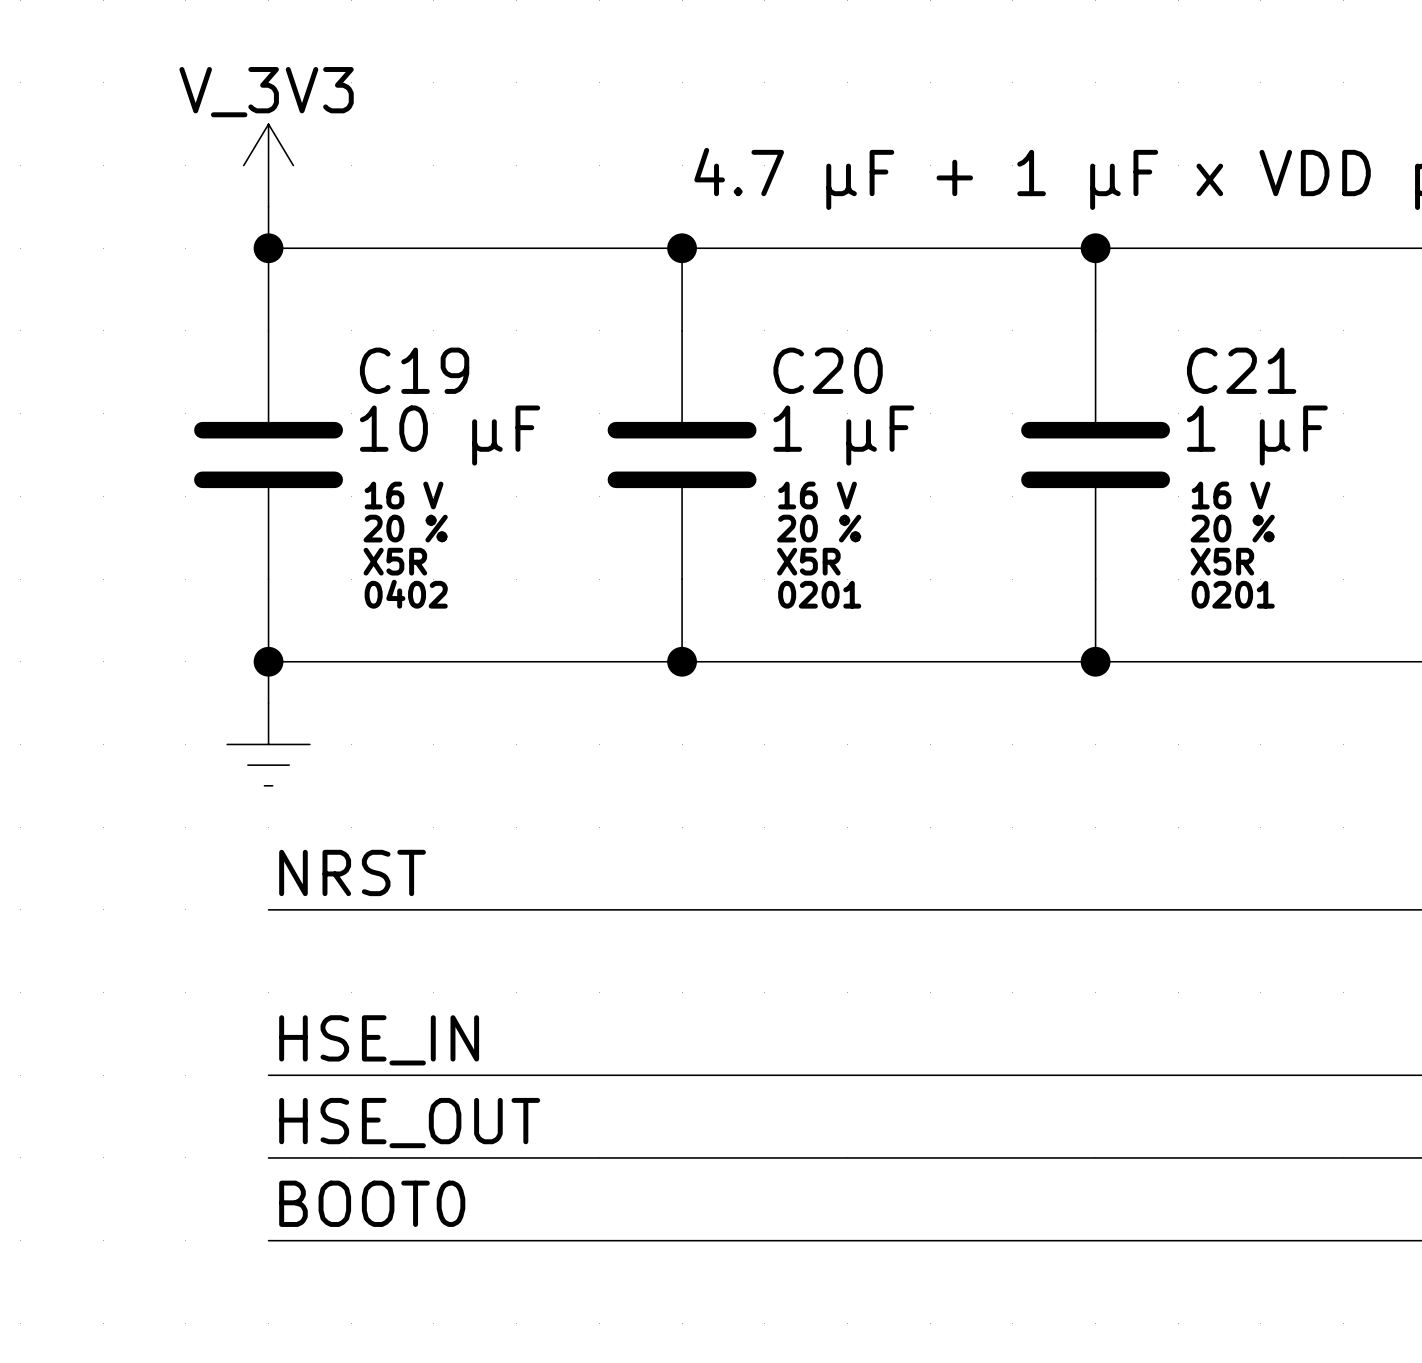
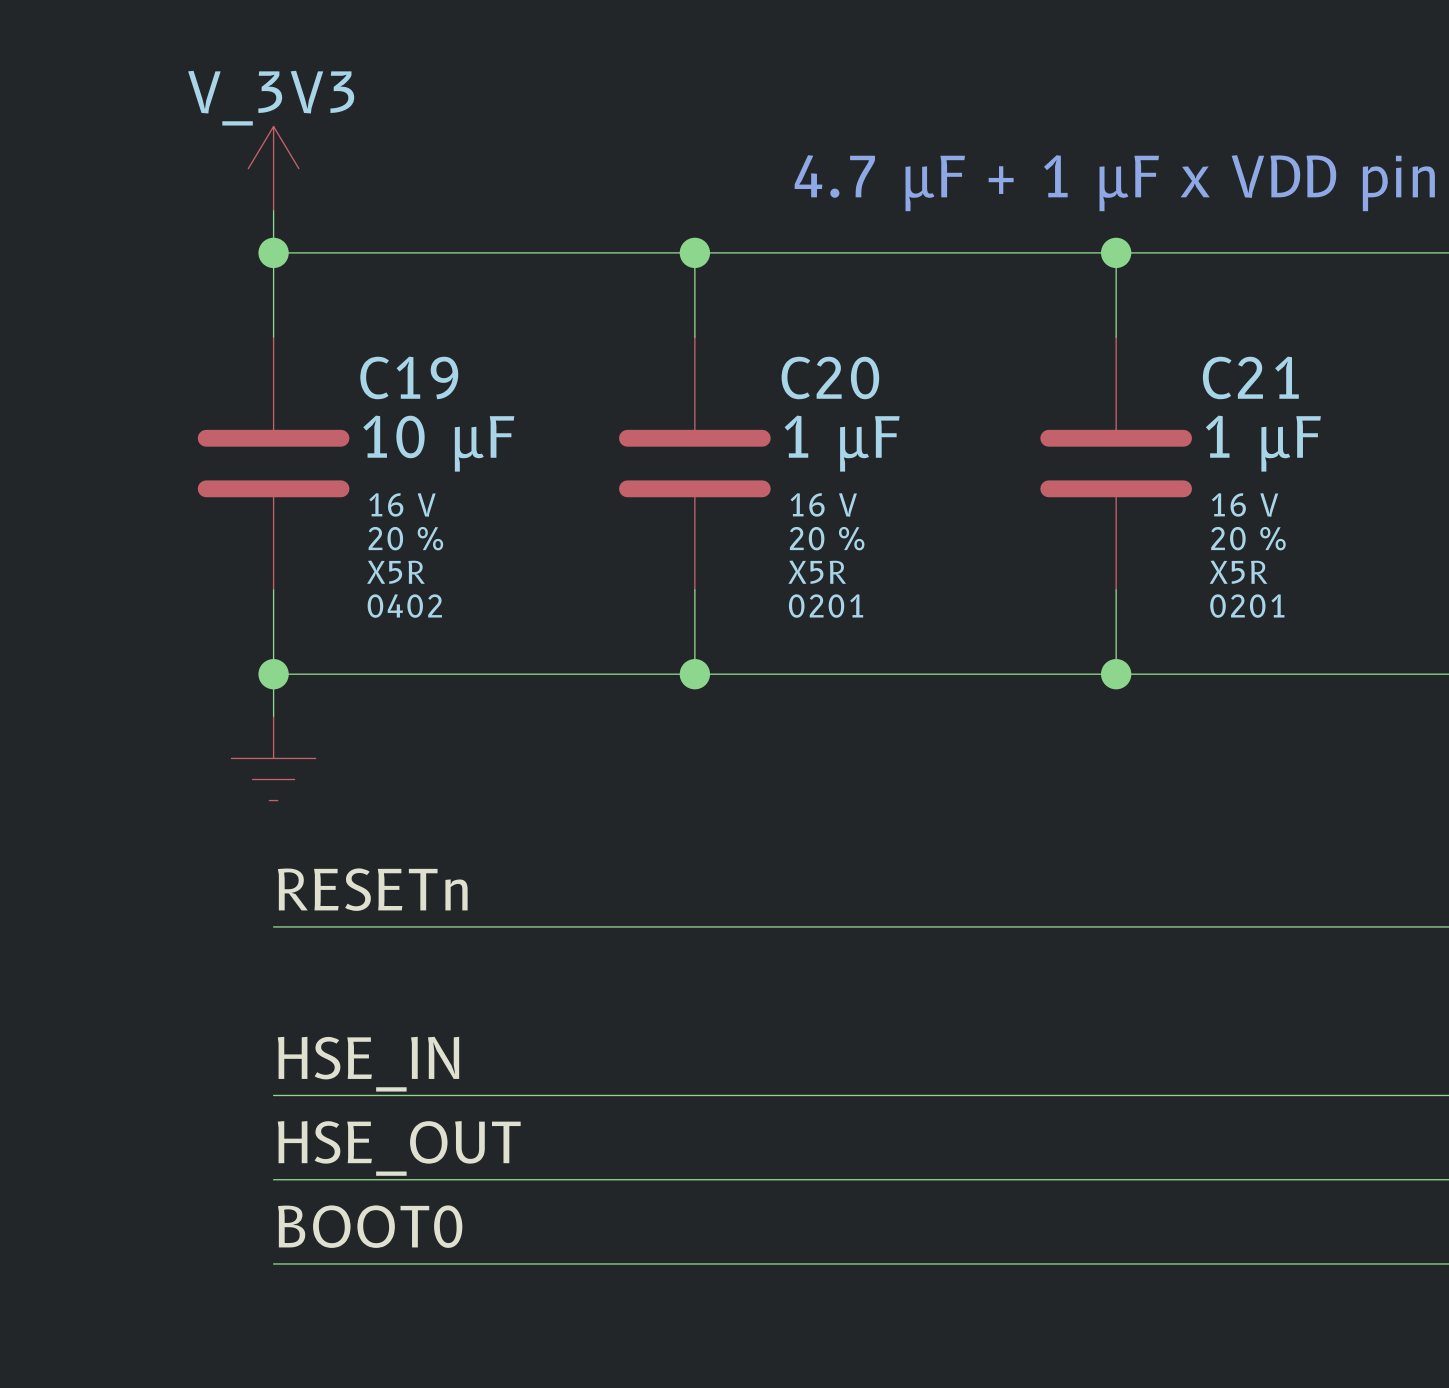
label: NRST (352, 872) -> RESETn (372, 889)

